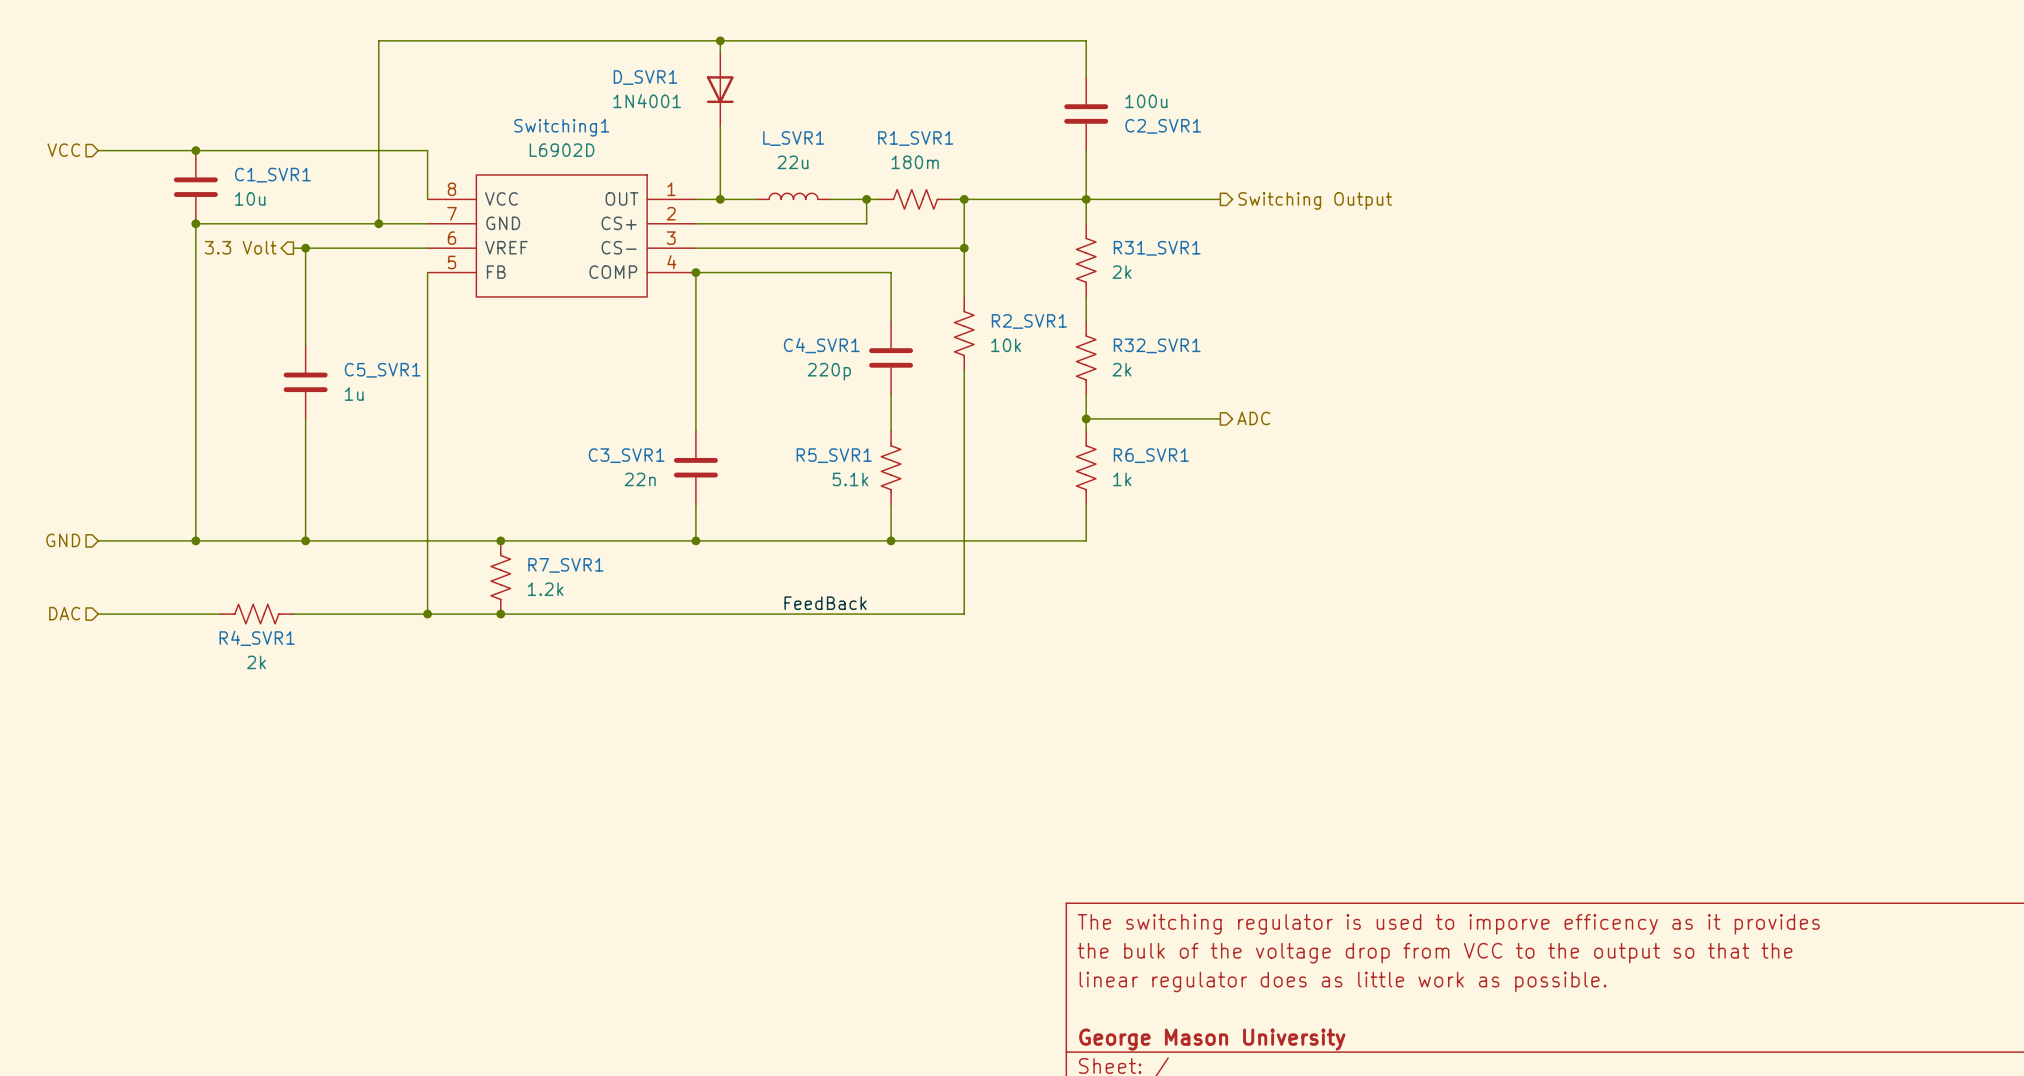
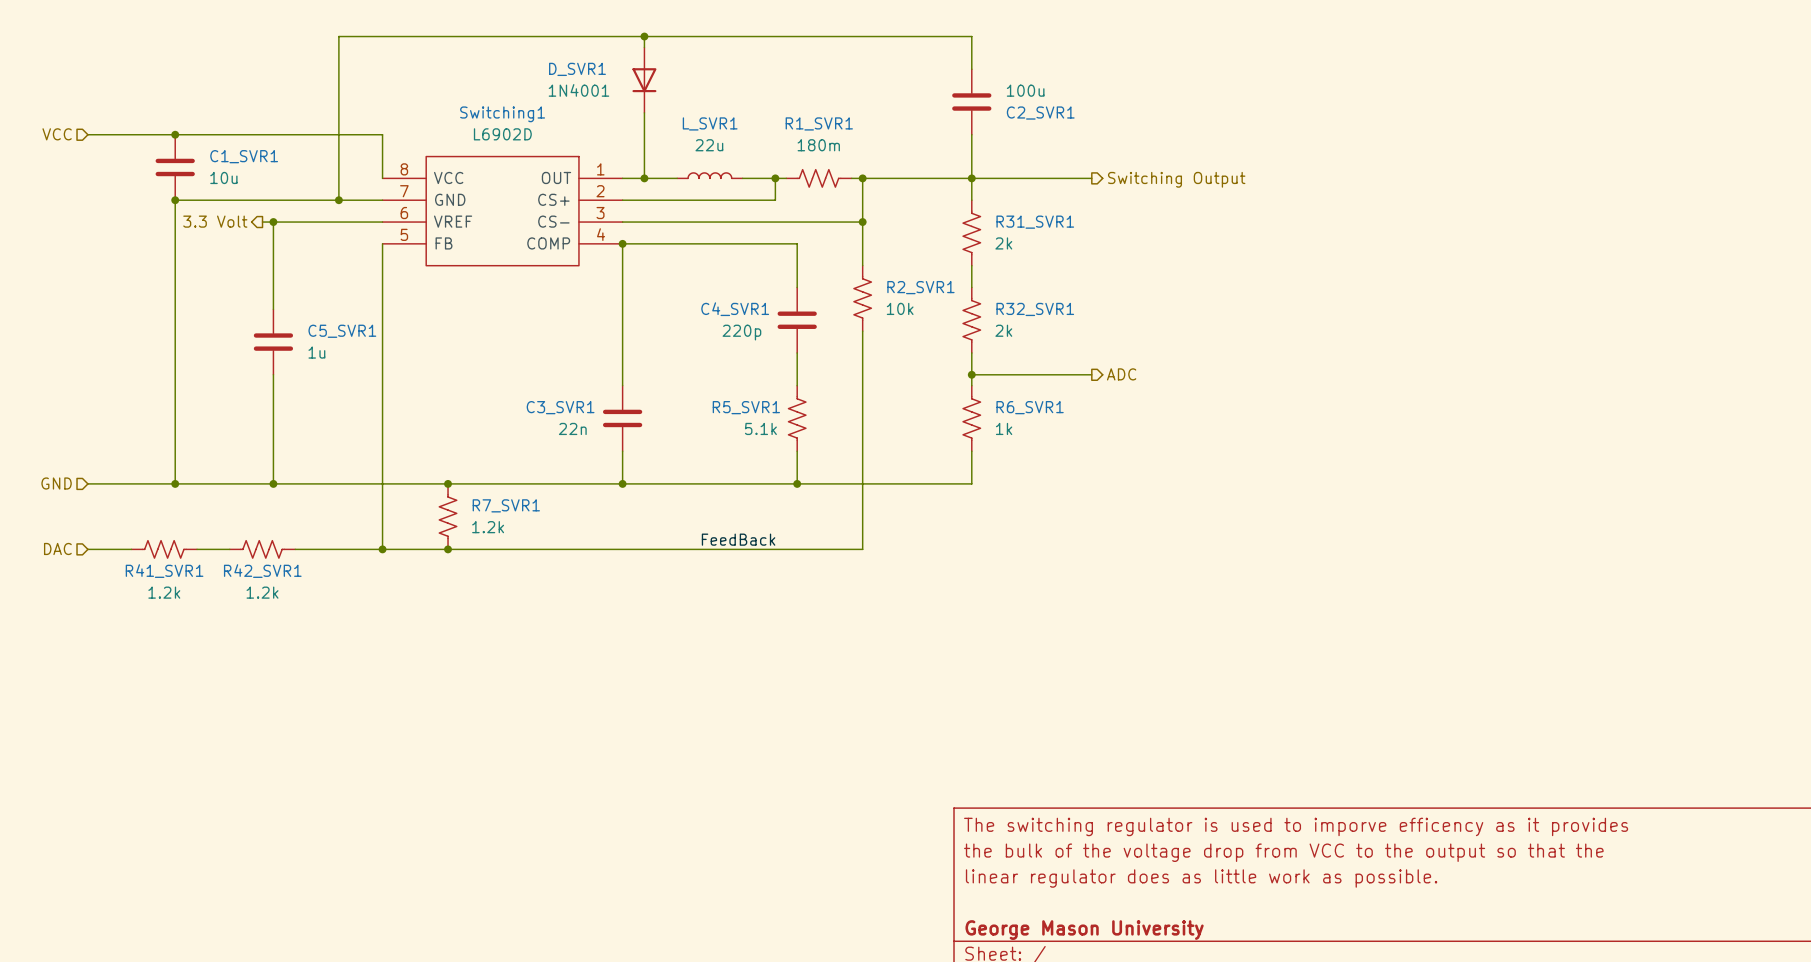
R41_SVR1: none -> 1.2k (164, 549)
R4_SVR1: 2k (256, 614) -> none
R42_SVR1: none -> 1.2k (262, 549)

